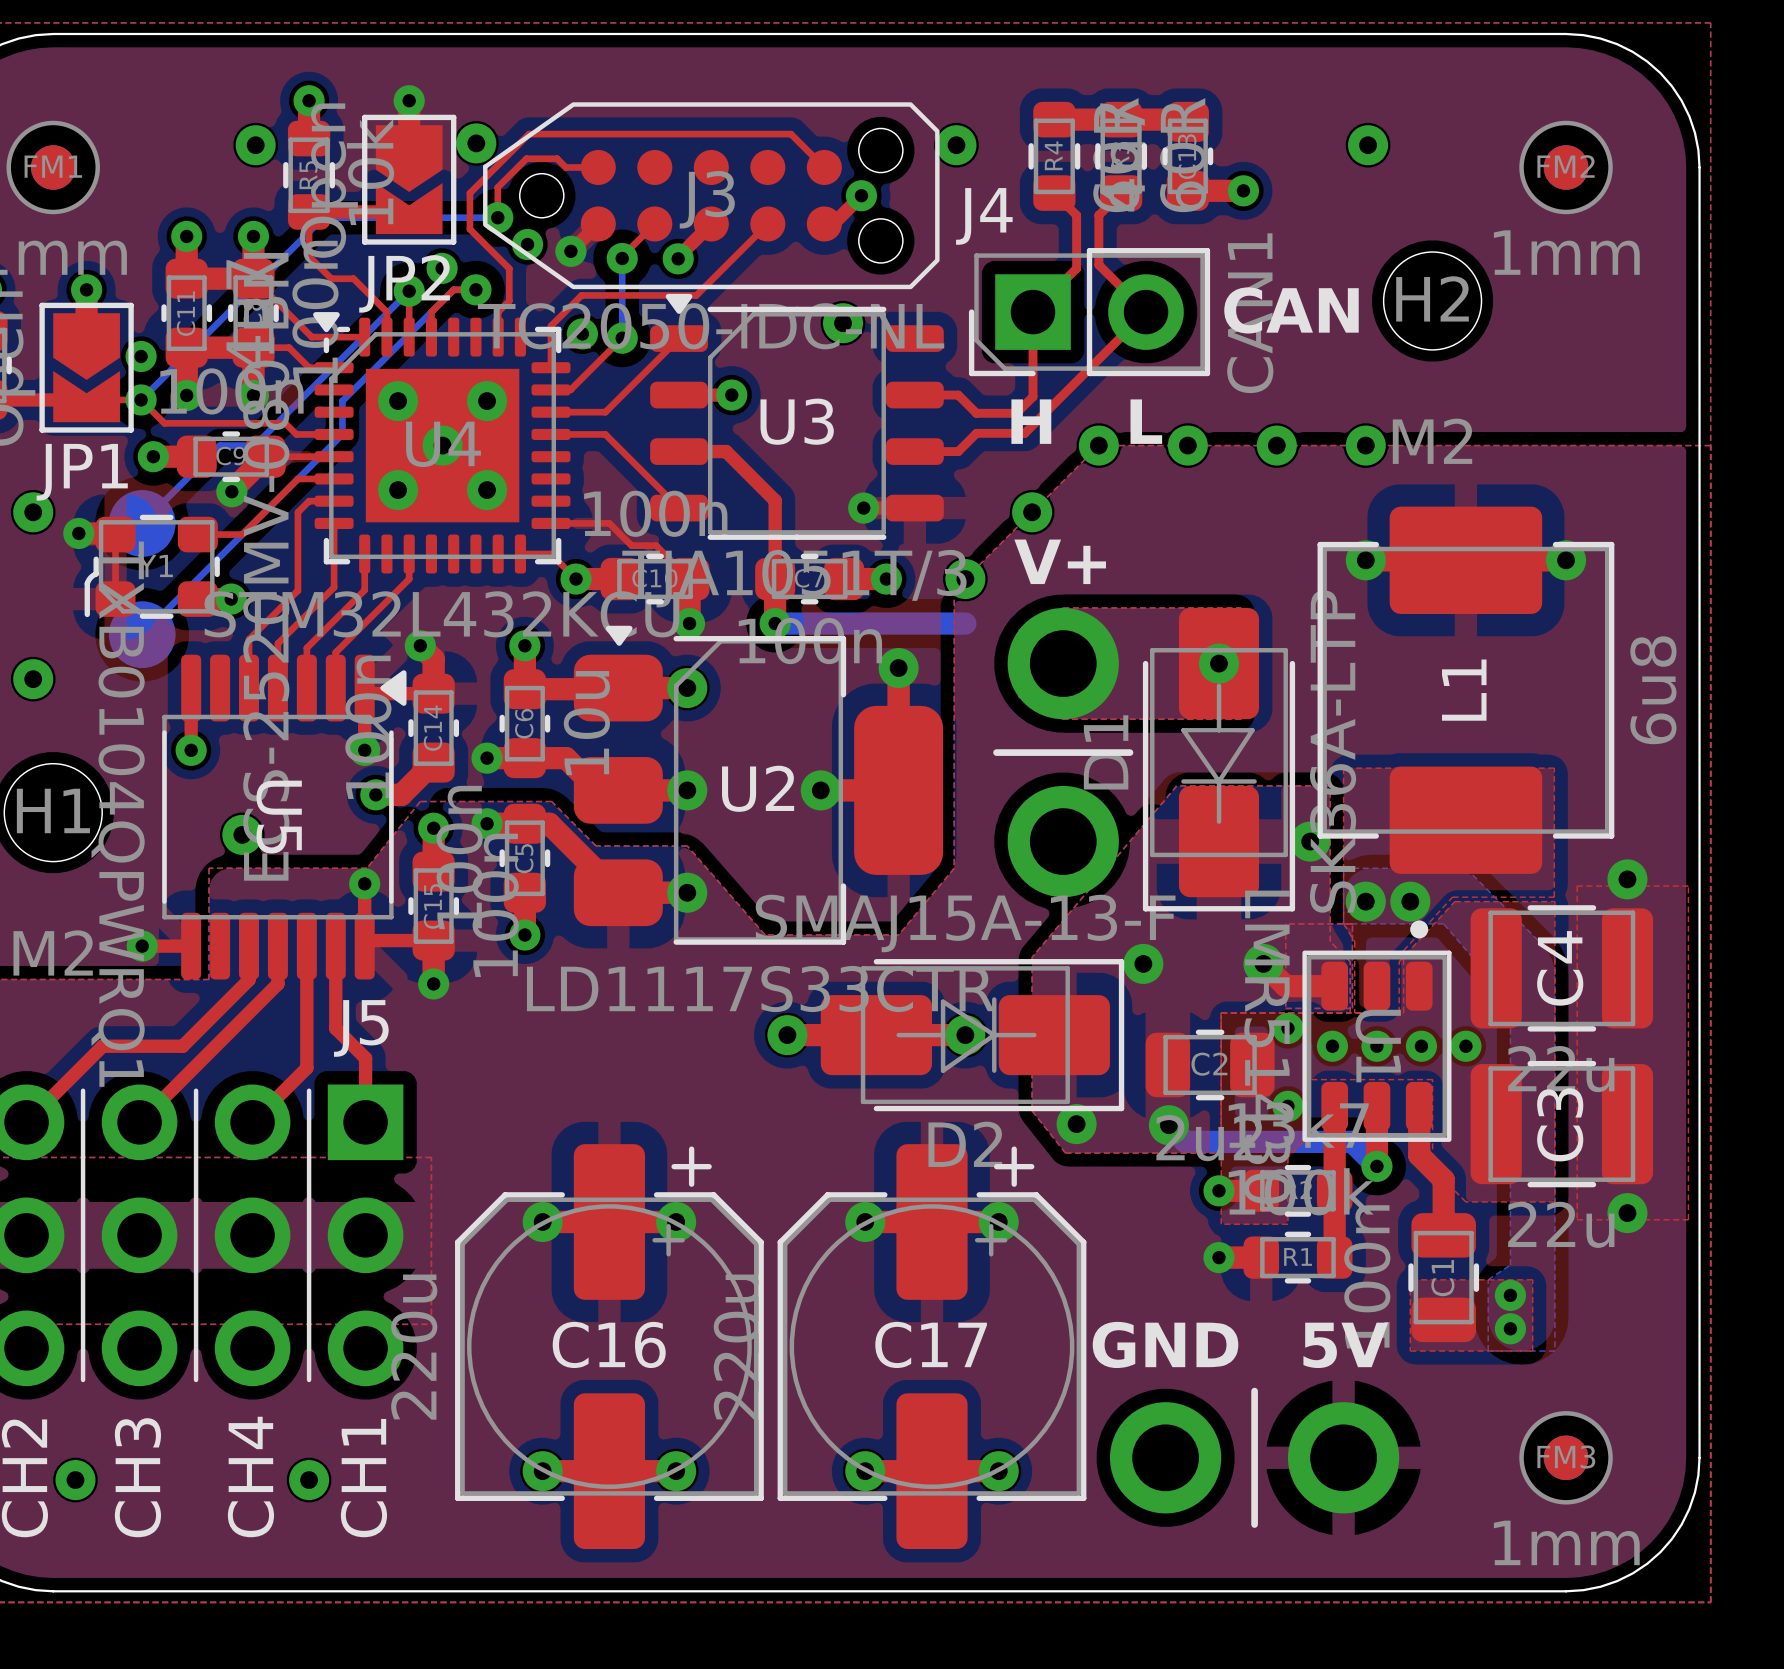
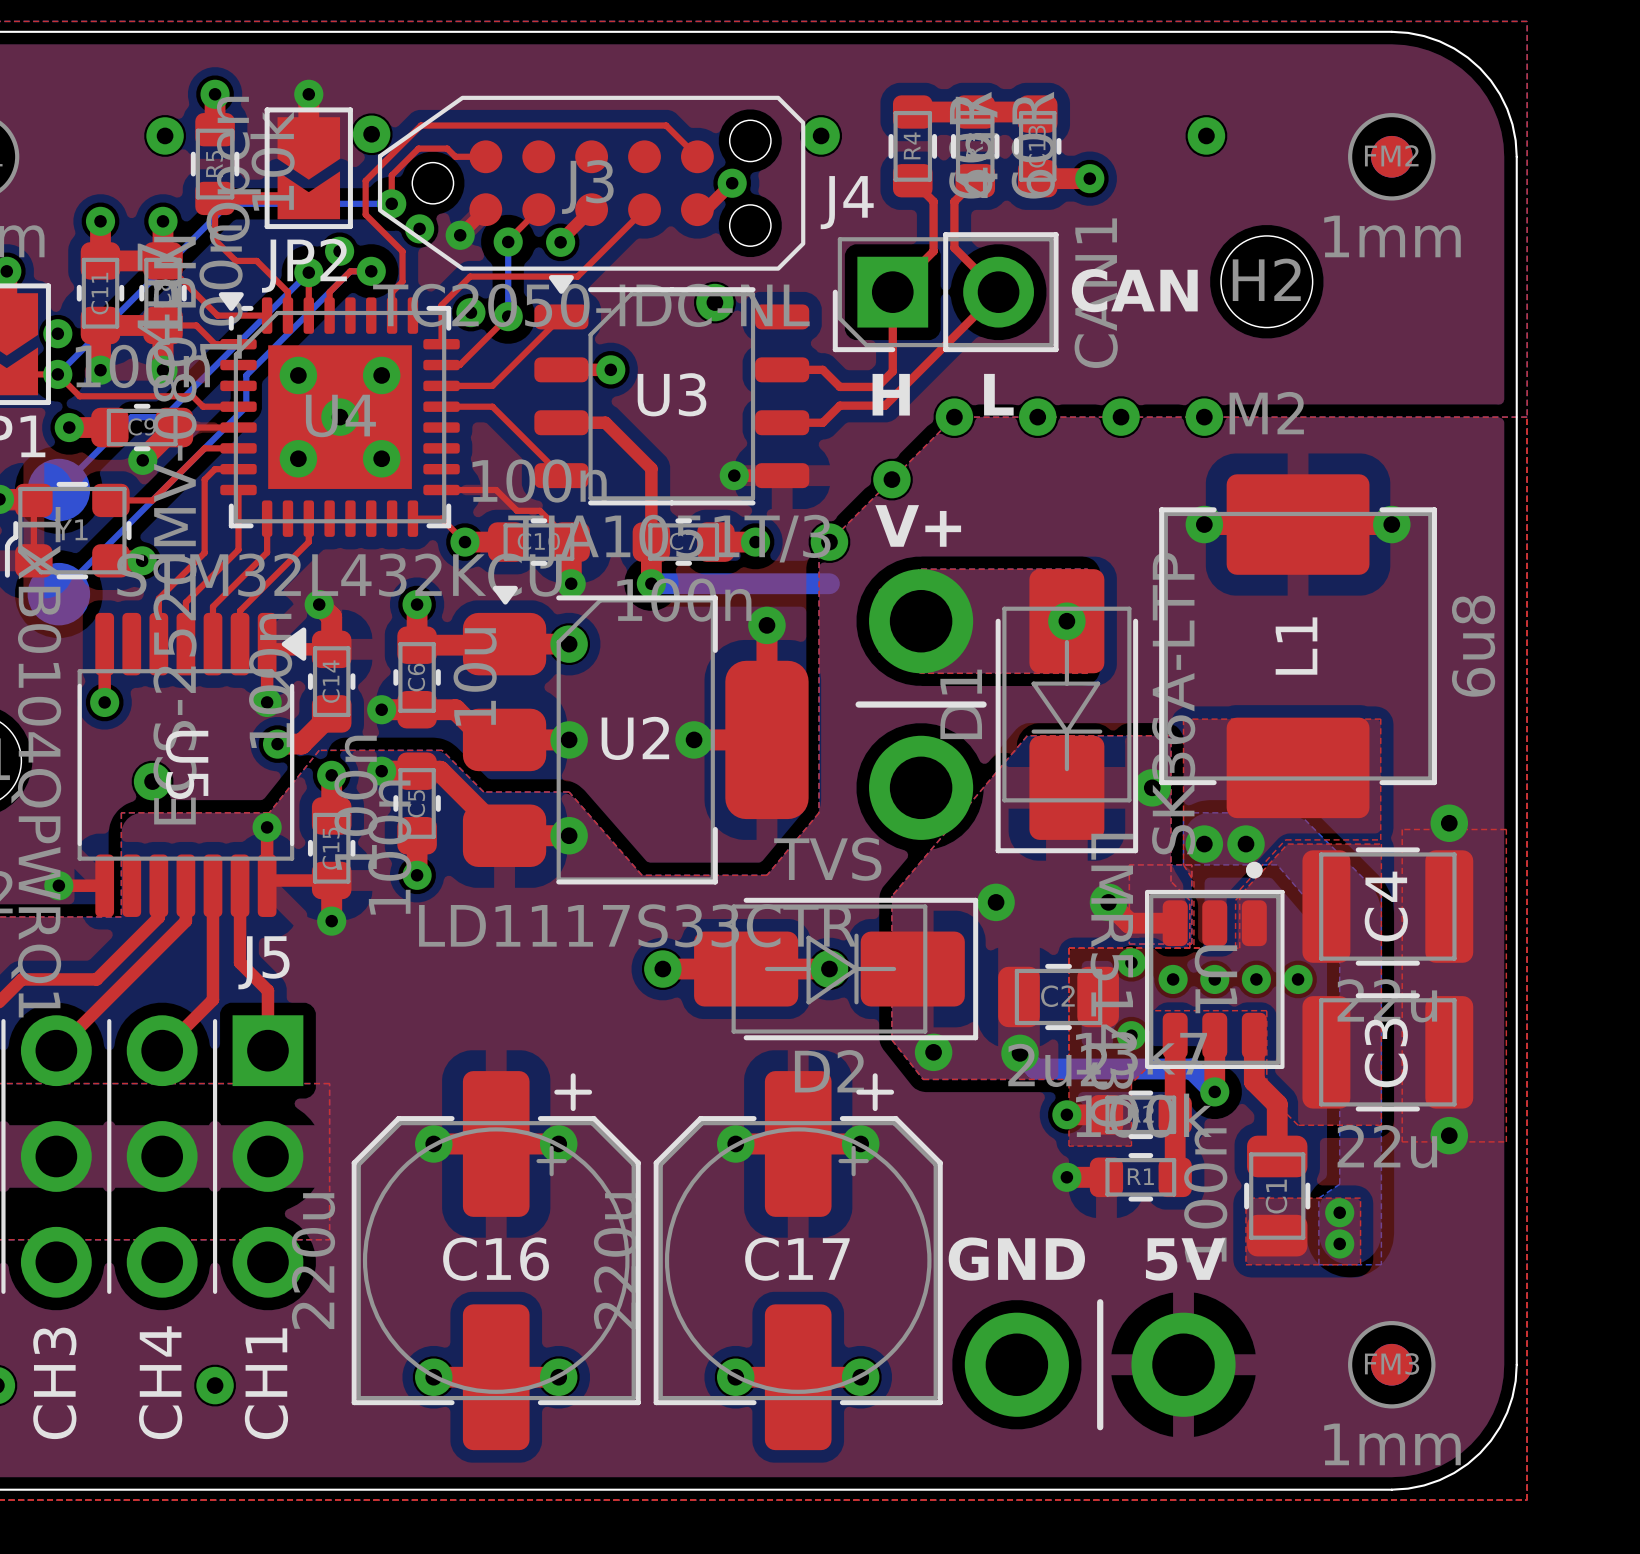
D2 value: SMAJ15A-13-F (965, 923) -> TVS (827, 859)

